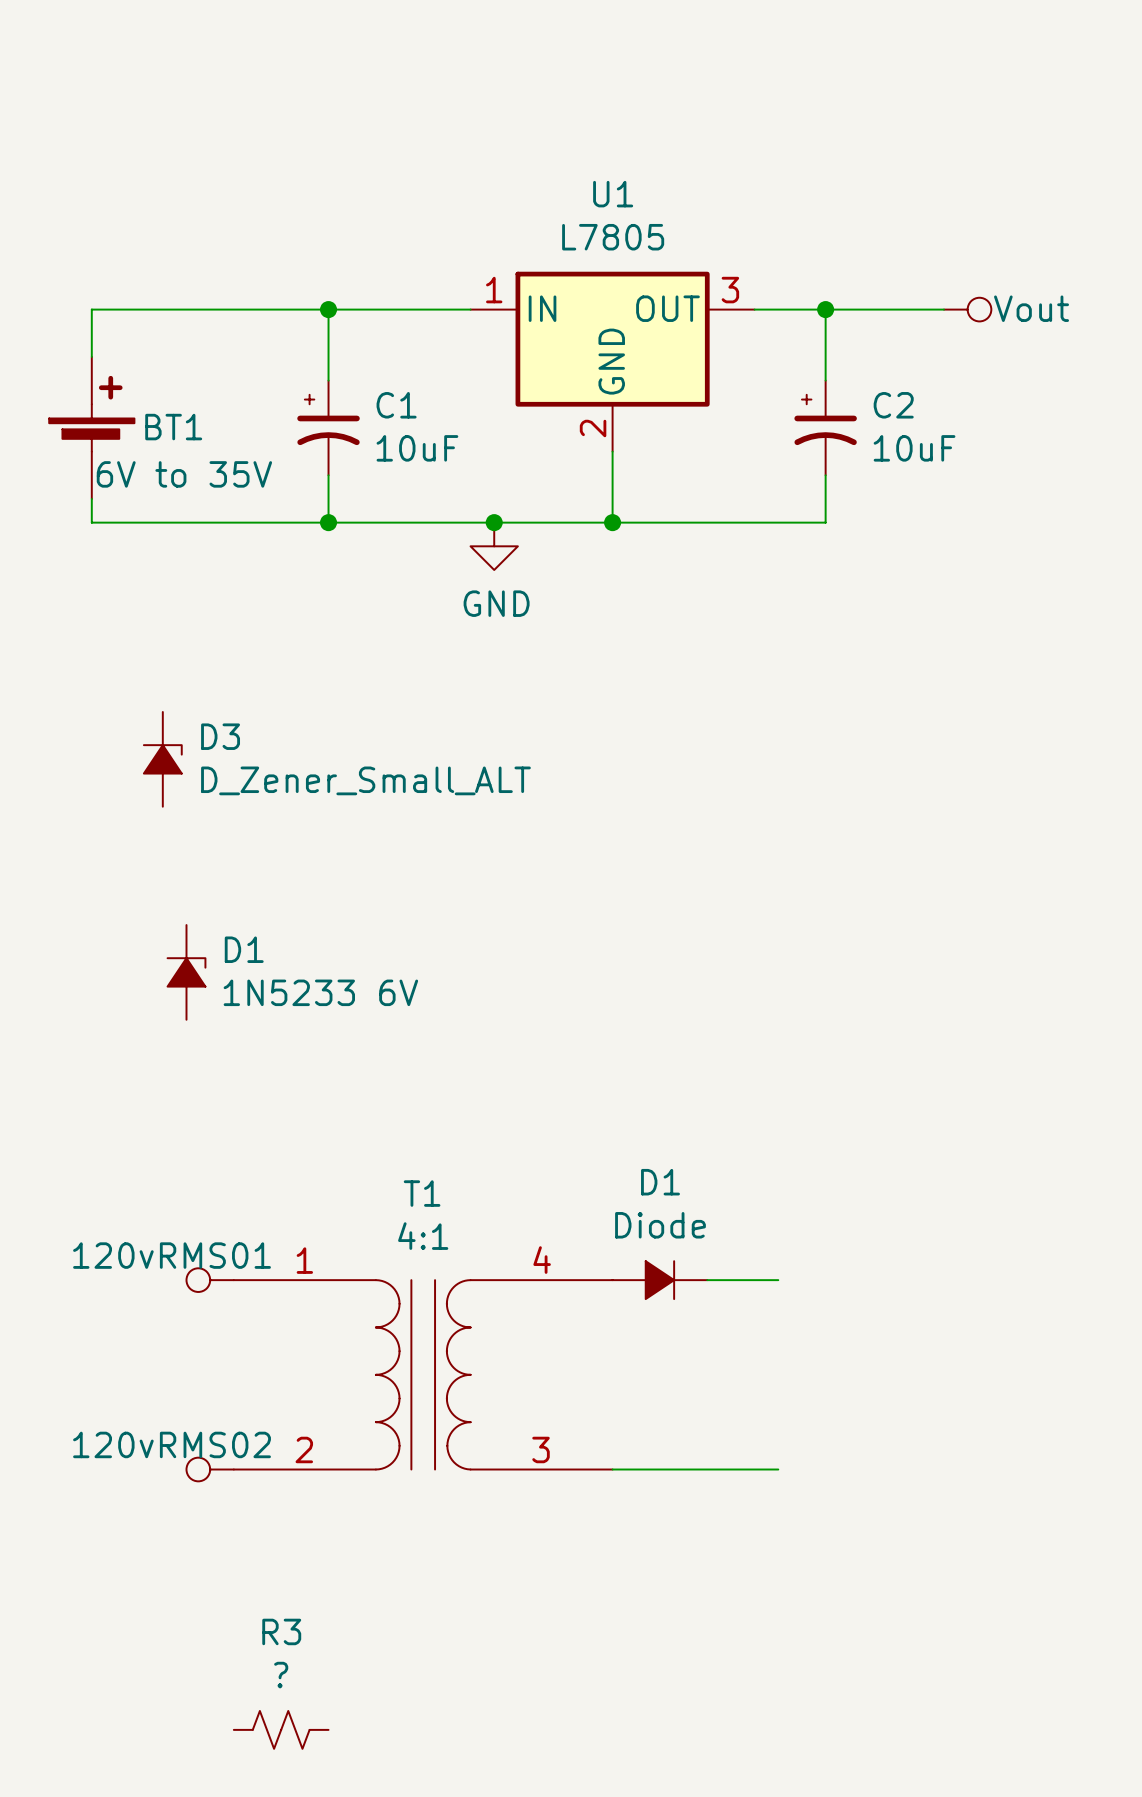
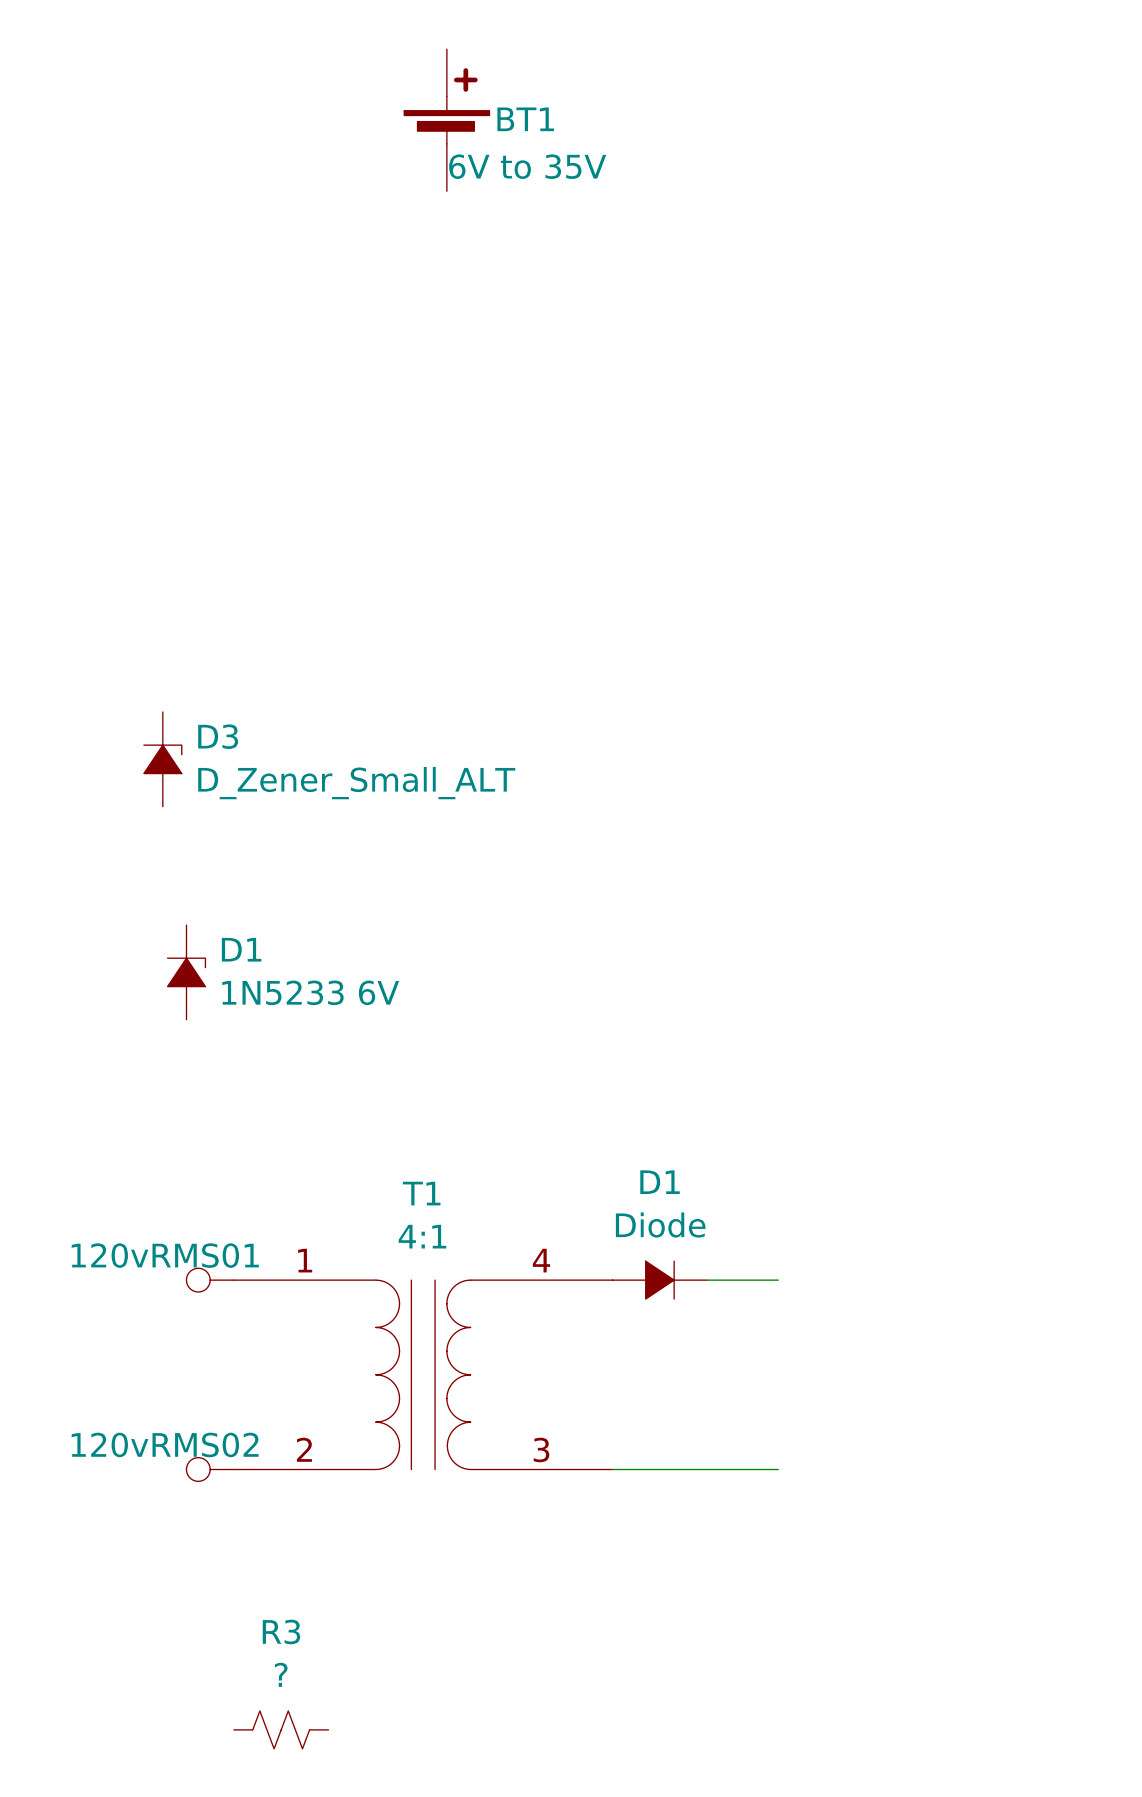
wire: (328, 309) (328, 380) -> none
junction: (328, 309) -> none
wire: (470, 309) (91, 309) (91, 356) -> none
wire: (754, 309) (943, 309) -> none
wire: (825, 309) (825, 380) -> none
junction: (825, 309) -> none
Vout: (967, 309) -> none
U1: L7805 (612, 361) -> none
BT1 position: (91, 427) -> (446, 120)
C1: 10uF (328, 427) -> none
C2: 10uF (825, 427) -> none
wire: (612, 451) (612, 522) -> none
wire: (328, 475) (328, 522) -> none
wire: (825, 475) (825, 522) (91, 522) (91, 498) -> none
junction: (328, 522) -> none
junction: (494, 522) -> none
junction: (612, 522) -> none
power symbol: GND (494, 546) -> none

